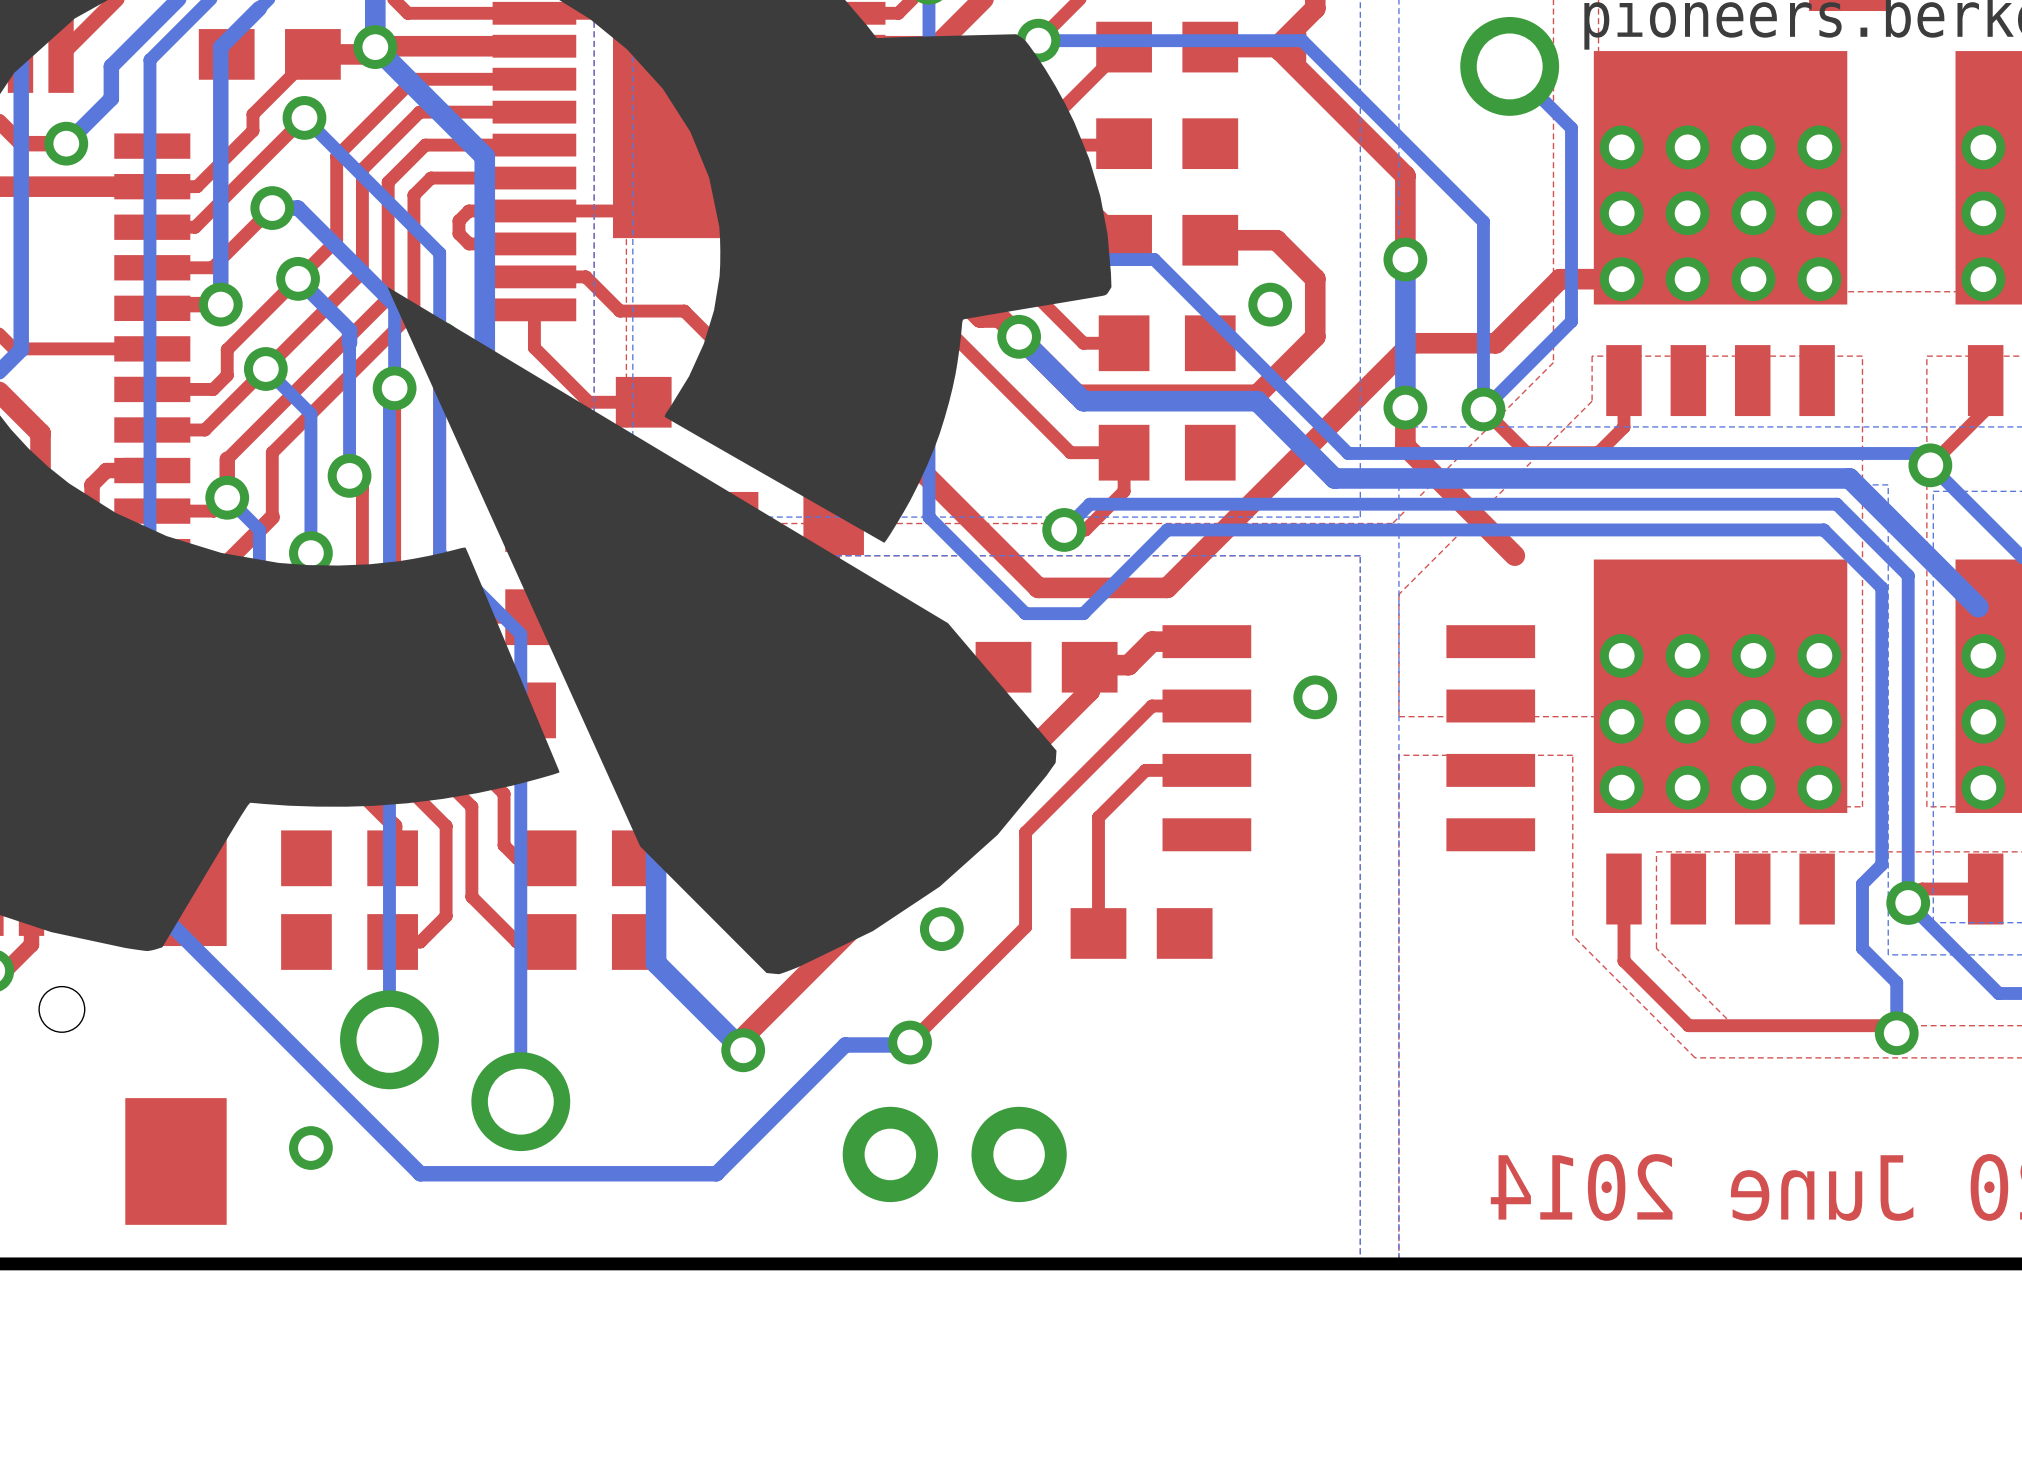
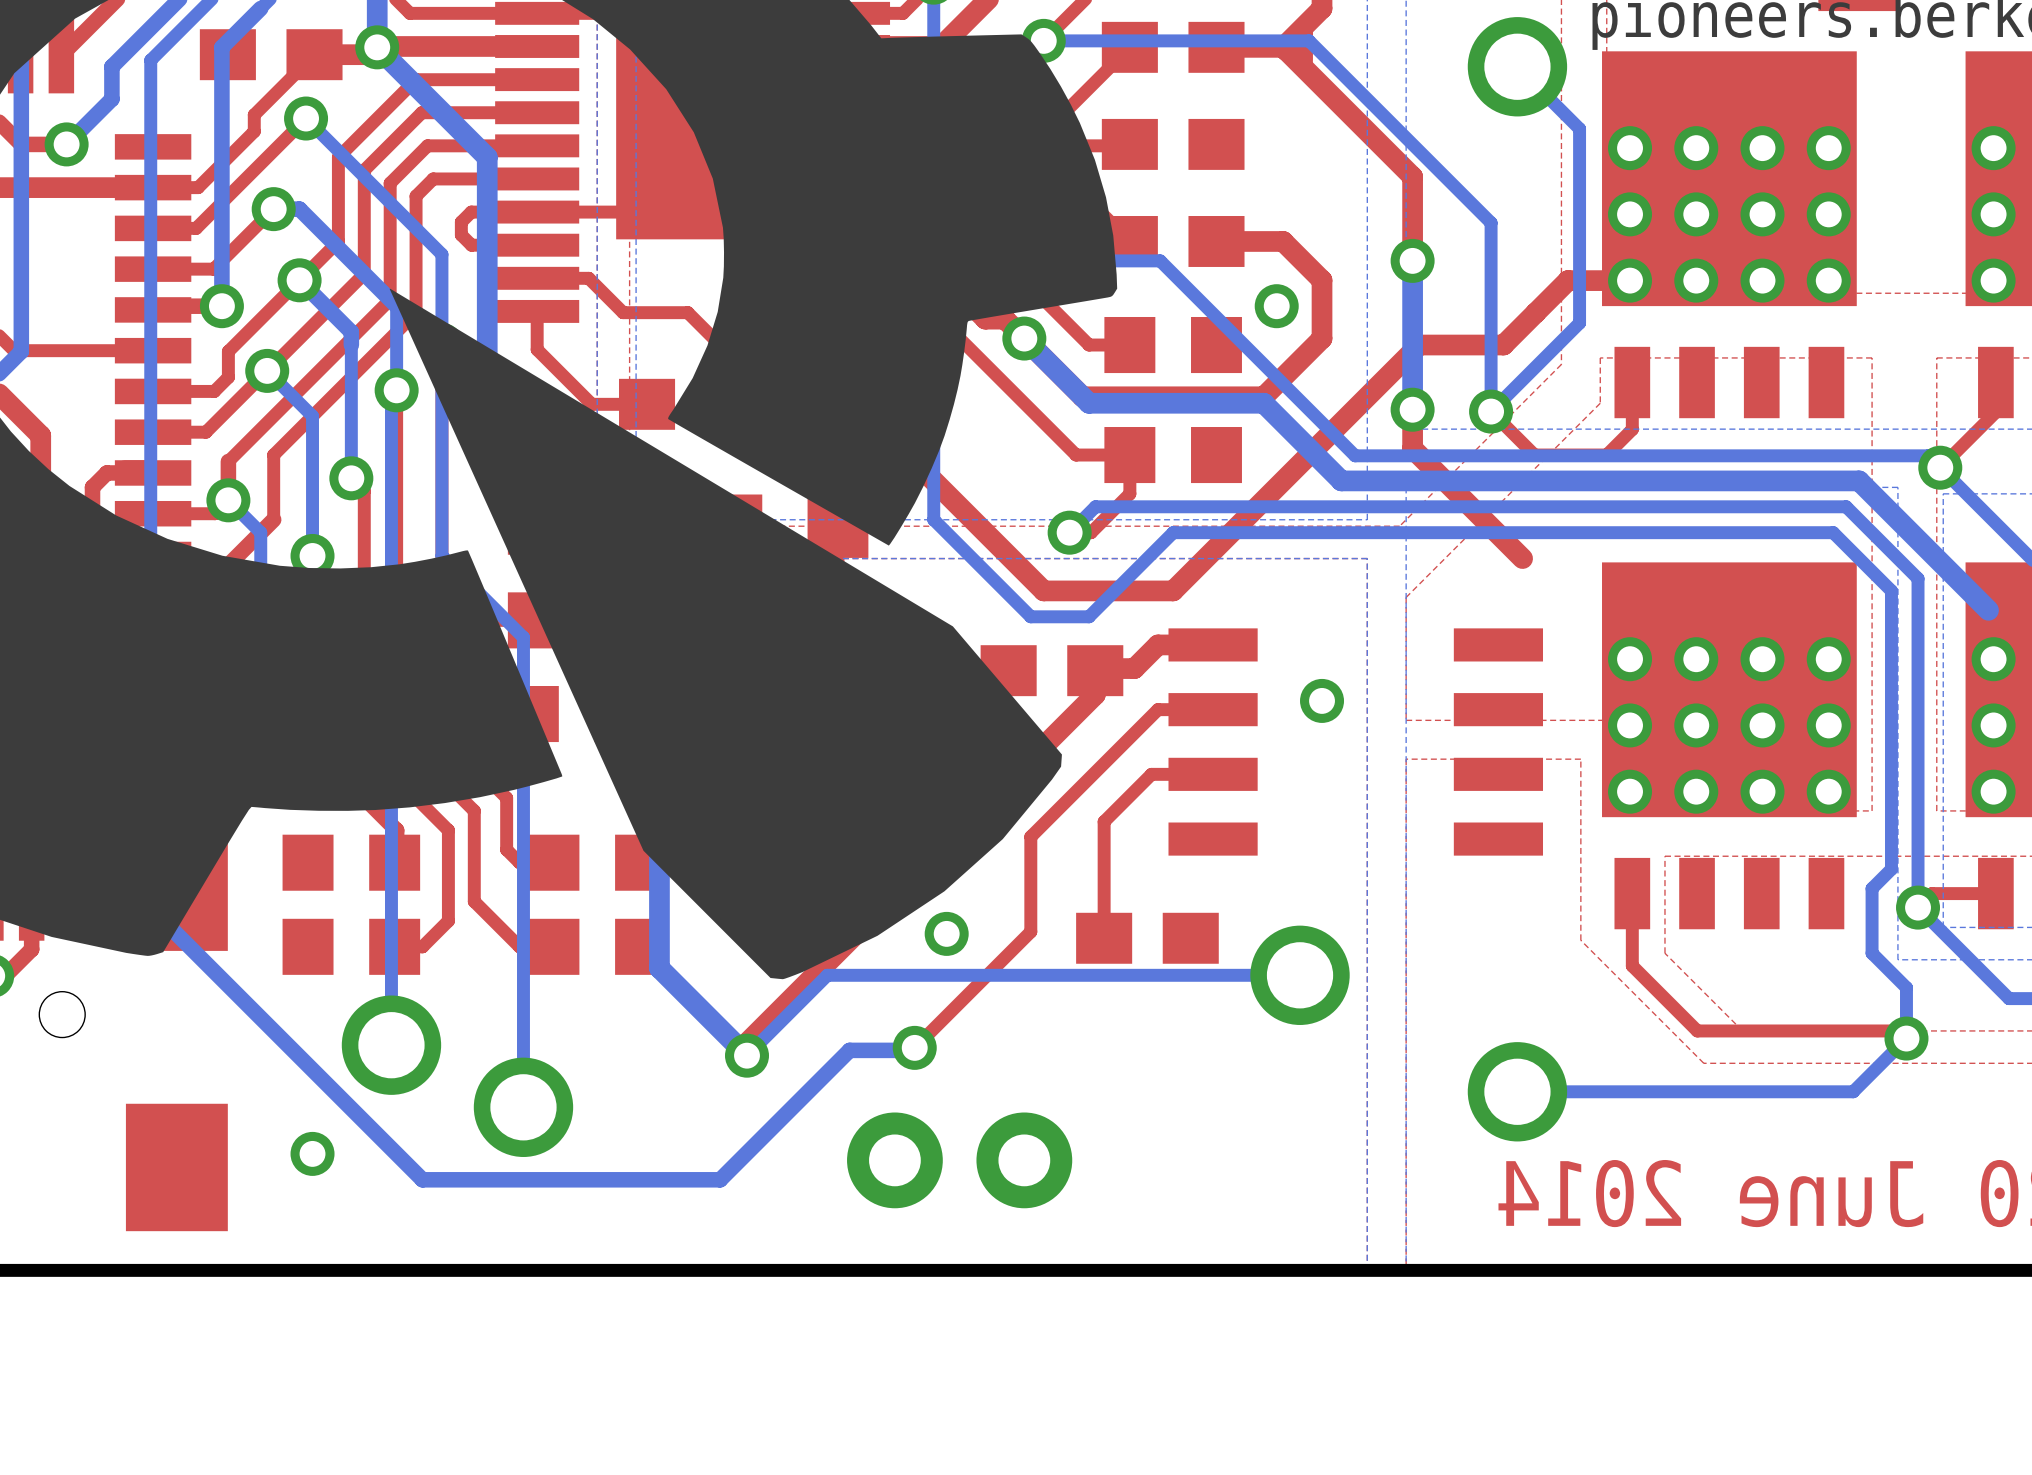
bottom track: none -> (1300, 975) (827, 975) (747, 1055)
via: none -> (1300, 975)
bottom track: none -> (1906, 1038) (1853, 1091) (1517, 1091)
via: none -> (1517, 1091)

